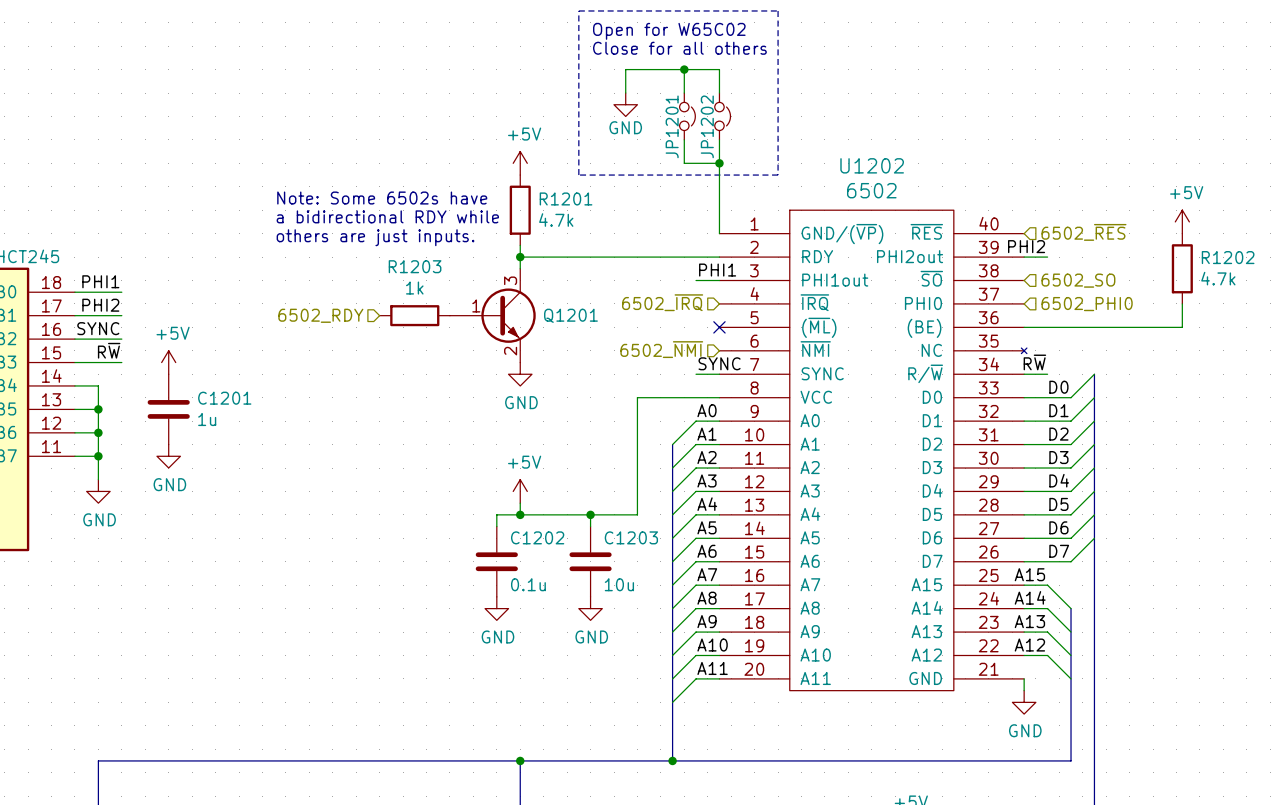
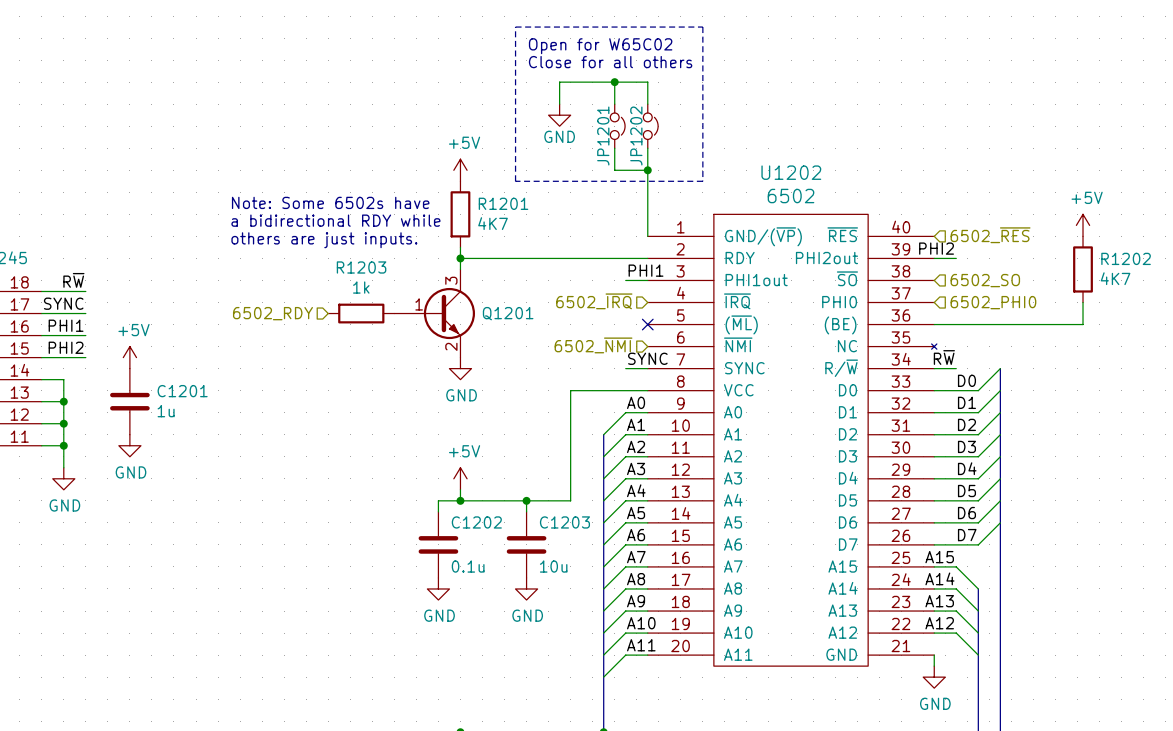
R1201 value: 4.7k (556, 220) -> 4K7 (493, 223)
R1202 value: 4.7k (1218, 278) -> 4K7 (1115, 278)
label: PHI1 (100, 281) -> R~{W} (73, 280)
label: PHI2 (100, 305) -> SYNC (63, 303)
label: SYNC (98, 328) -> PHI1 (66, 325)
label: R~{W} (109, 350) -> PHI2 (66, 347)

